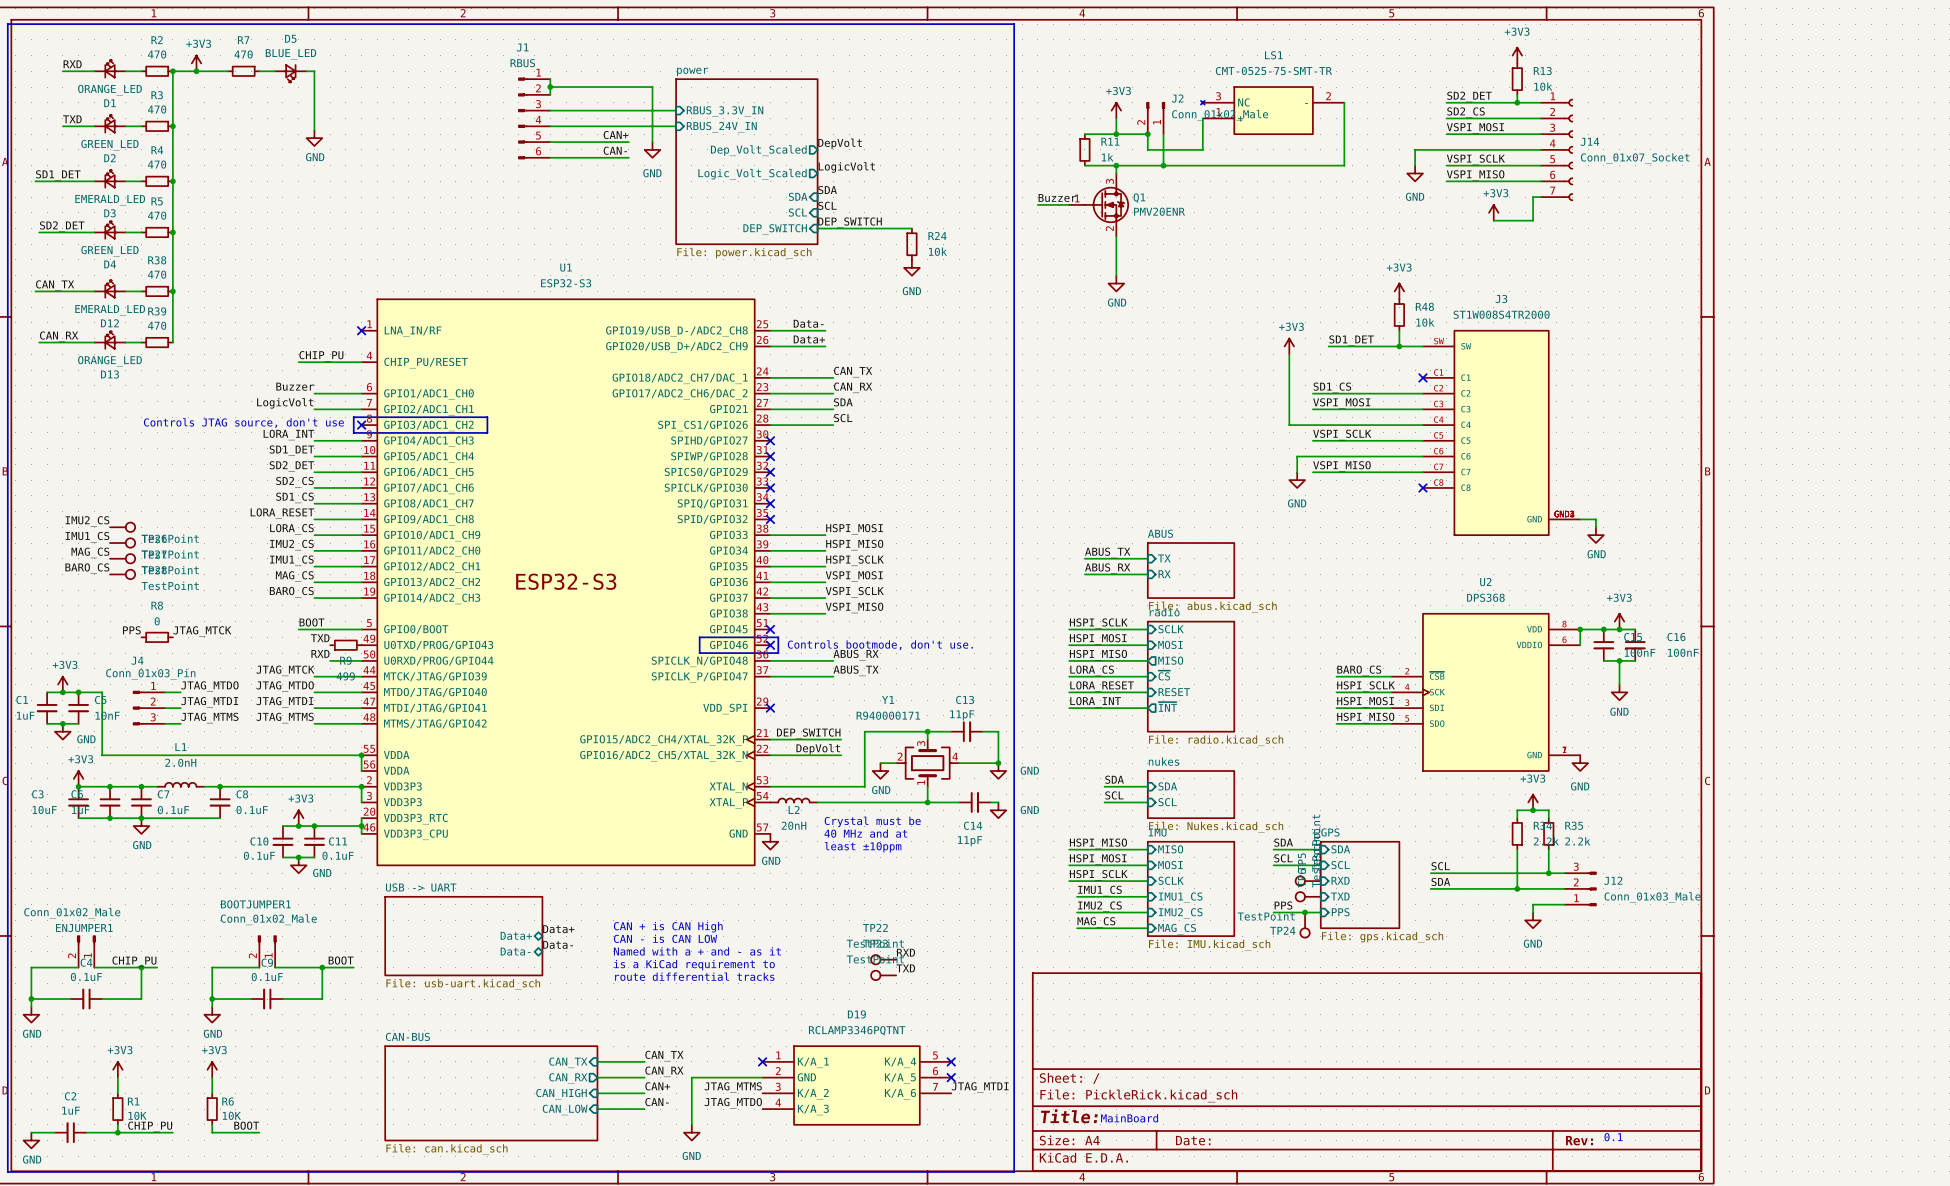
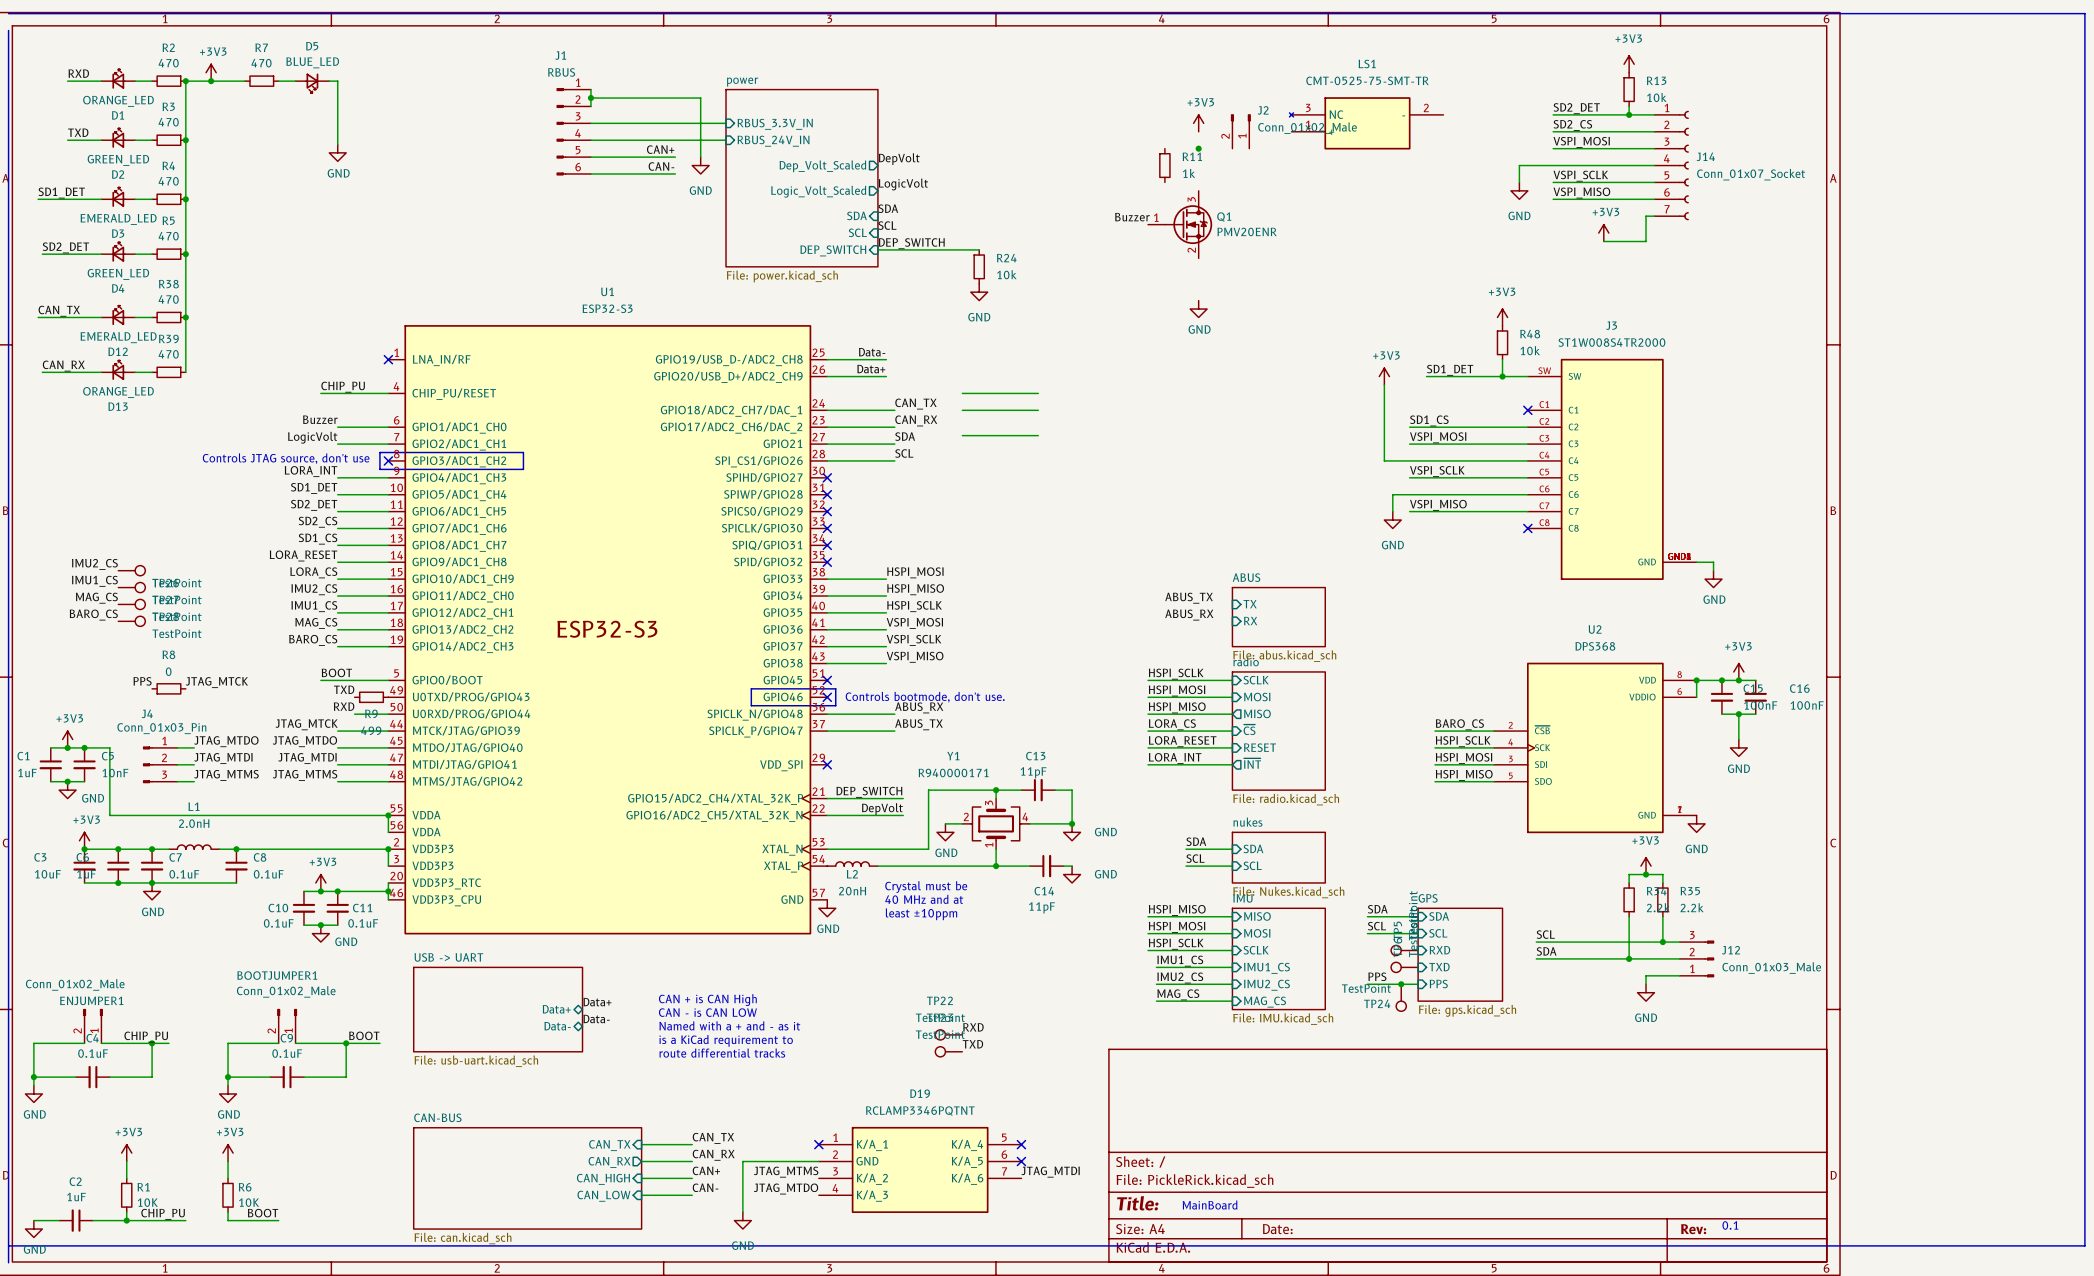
line: none -> (8, 13) (2084, 13) (2084, 1245) (8, 1245)
line: (7, 24) (1014, 24) (1014, 1171) (7, 1171) -> none
wire: (1344, 102) (1344, 165) (1084, 165) -> none
wire: (1116, 118) (1116, 134) -> none
wire: (1202, 118) (1202, 149) (1147, 149) (1147, 134) (1084, 134) -> none
junction: (1147, 134) -> none
wire: (1163, 134) (1163, 165) -> none
wire: (1116, 165) (1116, 173) -> none
junction: (1116, 165) -> none
junction: (1163, 165) -> none
wire: (1037, 204) (1069, 204) -> none
wire: (1116, 236) (1116, 275) -> none
wire: none -> (962, 393) (1038, 393)
wire: none -> (962, 410) (1038, 410)
wire: none -> (962, 435) (1038, 435)
wire: (1084, 558) (1147, 558) -> none
wire: (1084, 574) (1147, 574) -> none

